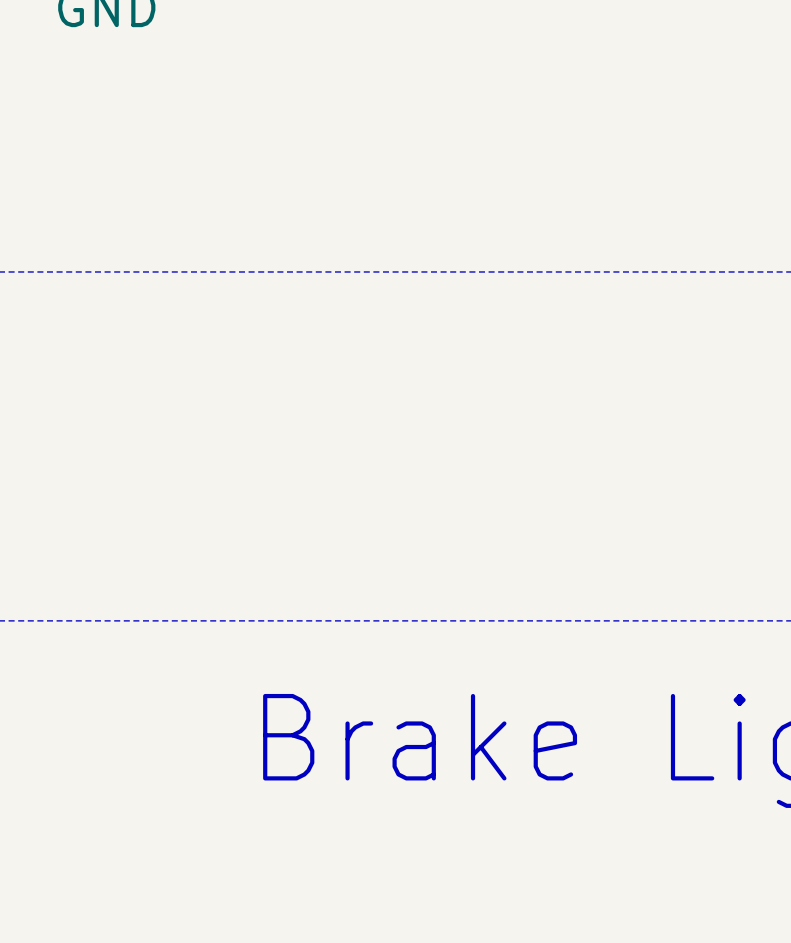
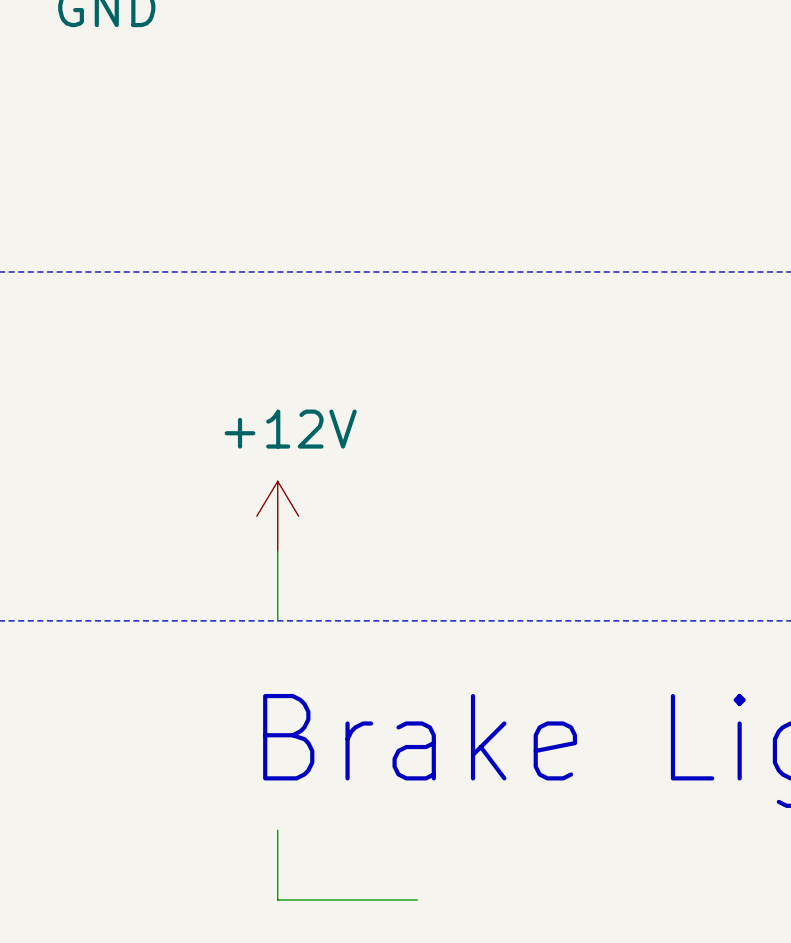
power symbol: none -> +12V (277, 516)
wire: none -> (277, 551) (277, 620)
wire: none -> (277, 830) (277, 900) (417, 900)

